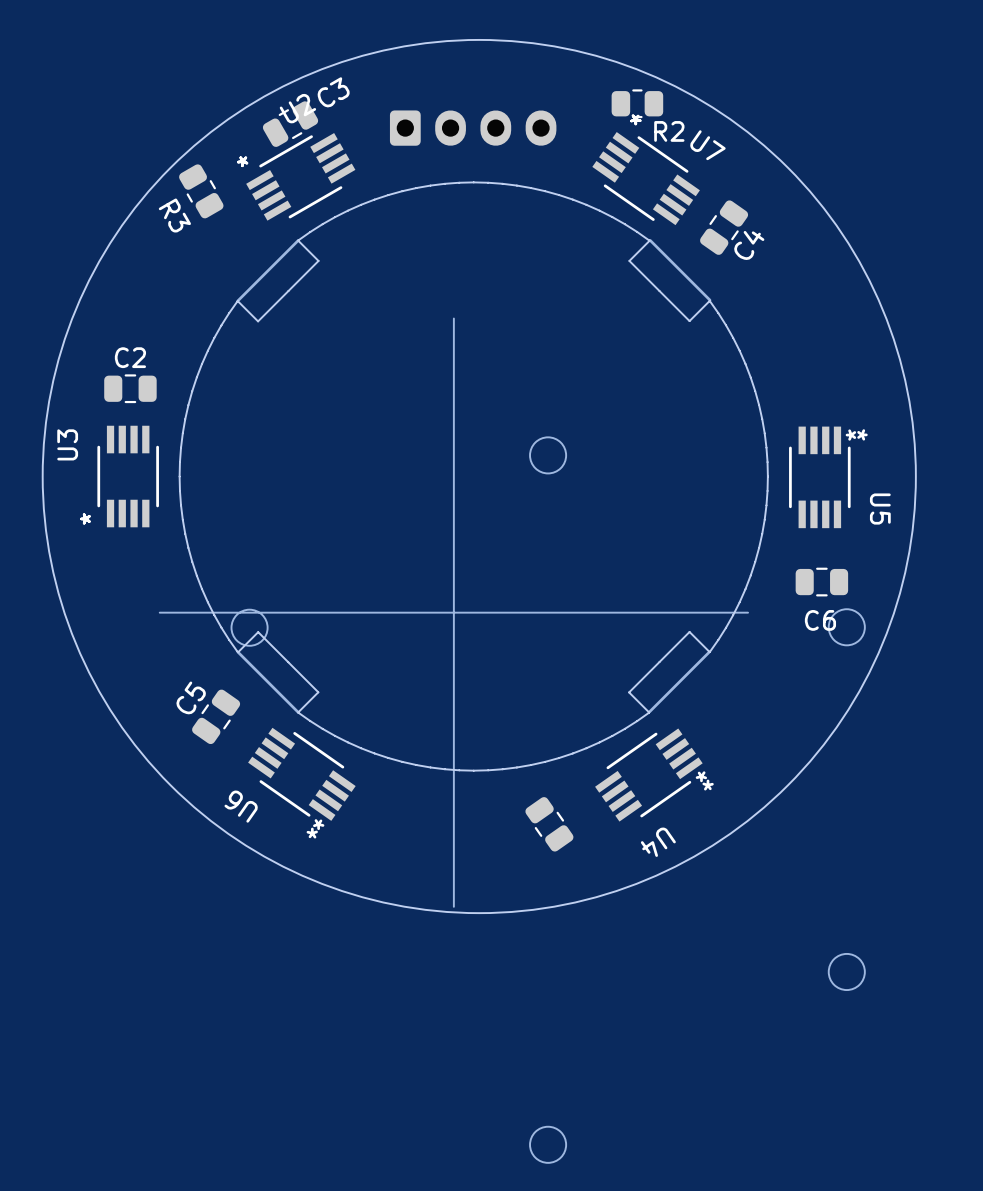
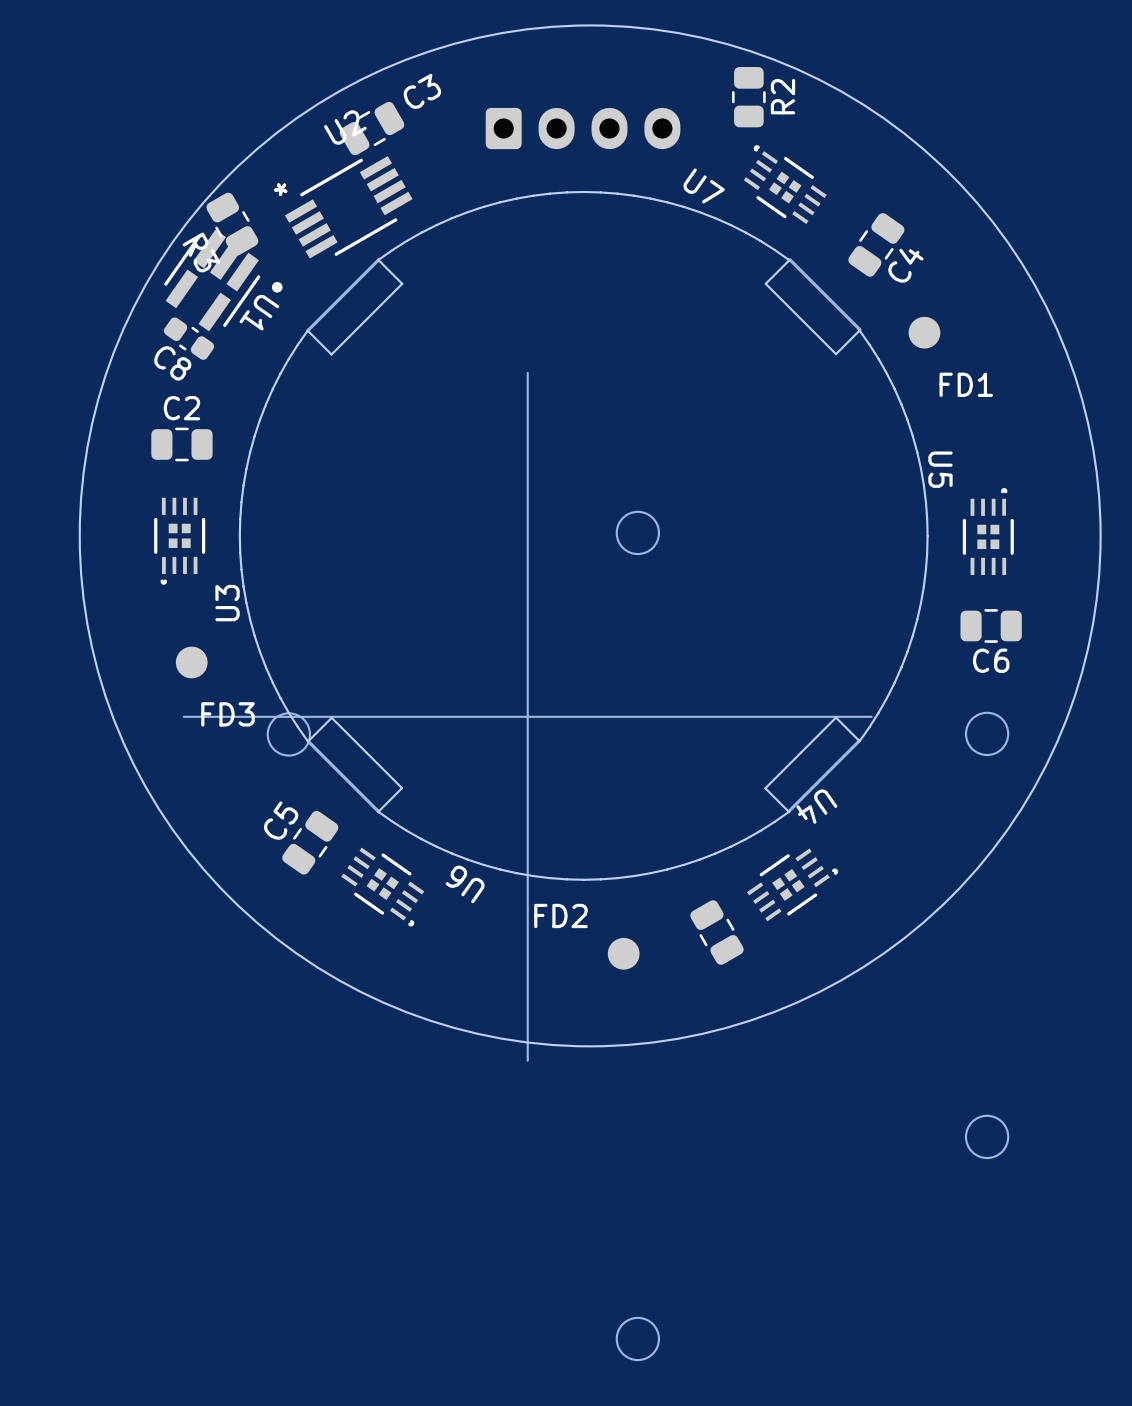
R2 rotation: 0° (637, 103) -> 90° clockwise (748, 97)
C3 position: (290, 124) -> (371, 128)
part position: (473, 128) -> (583, 128)
U7 footprint: [592, 132, 700, 226] -> [743, 145, 827, 225]
U7 name position: U7 (707, 145) -> U7 (704, 185)
C4 position: (724, 227) -> (876, 244)
U1: none -> (223, 280)
line: (298, 240) (237, 300) -> (378, 259) (307, 330)
board edge: (298, 240) (322, 224) (347, 210) (402, 191) (459, 182) (516, 185) (545, 191) (586, 204) (612, 217) (648, 240) (629, 260) (689, 321) (710, 301) (739, 350) (759, 405) (767, 462) (764, 519) (755, 561) (745, 589) (733, 615) (710, 651) (689, 631) (629, 692) (649, 712) -> (378, 260) (406, 240) (436, 225) (467, 212) (500, 202) (533, 195) (566, 192) (600, 192) (634, 195) (667, 202) (715, 218) (745, 232) (788, 259) (765, 283) (836, 354) (859, 331) (878, 359) (894, 388) (907, 420) (917, 452) (923, 485) (927, 519) (927, 552) (923, 586) (912, 635) (901, 667) (878, 712) (859, 740) (836, 717) (765, 788) (788, 811)
board edge: (298, 240) (318, 260) -> (378, 260) (402, 283)
line: (650, 240) (710, 300) -> (790, 259) (859, 329)
board edge: (318, 260) (258, 321) (237, 301) (207, 350) (196, 377) (185, 419) (179, 476) (181, 505) (188, 548) (207, 602) (221, 627) (238, 652) -> (402, 283) (331, 354) (307, 331) (288, 359) (272, 388) (259, 420) (246, 468) (241, 502) (239, 535) (241, 569) (250, 619) (259, 651) (272, 682) (288, 712) (308, 741)
FD1: none -> (924, 332)
C8: none -> (189, 338)
C2 position: (130, 388) -> (181, 444)
U3 footprint: [97, 425, 159, 528] -> [154, 497, 206, 585]
U5 footprint: [789, 426, 851, 529] -> [962, 488, 1014, 576]
U3 name position: U3 (67, 444) -> U3 (227, 603)
round board edge position: (479, 476) -> (590, 535)
U5 name position: U5 (880, 509) -> U5 (940, 469)
FD3: none -> (191, 662)
C6 position: (821, 582) -> (991, 625)
C6 name position: C6 (820, 620) -> C6 (991, 660)
line: (238, 652) (298, 712) -> (308, 741) (378, 811)
board edge: (238, 652) (258, 632) (318, 692) (298, 712) (335, 735) (361, 748) (388, 758) (430, 767) (488, 770) (545, 761) (599, 742) (648, 712) -> (308, 741) (331, 717) (402, 788) (378, 812) (421, 839) (452, 853) (483, 864) (533, 876) (566, 879) (600, 879) (634, 876) (667, 869) (699, 859) (730, 846) (760, 830) (788, 812)
line: (709, 652) (649, 711) -> (858, 741) (789, 811)
C5 position: (216, 716) -> (310, 842)
U6 footprint: [248, 727, 356, 821] -> [341, 847, 425, 927]
U4 footprint: [595, 728, 703, 822] -> [747, 848, 839, 922]
part: none -> (716, 932)
U6 name position: U6 (241, 806) -> U6 (465, 884)
FD2: none -> (623, 953)
part: (549, 824) -> none
U4 name position: U4 (658, 842) -> U4 (816, 806)

